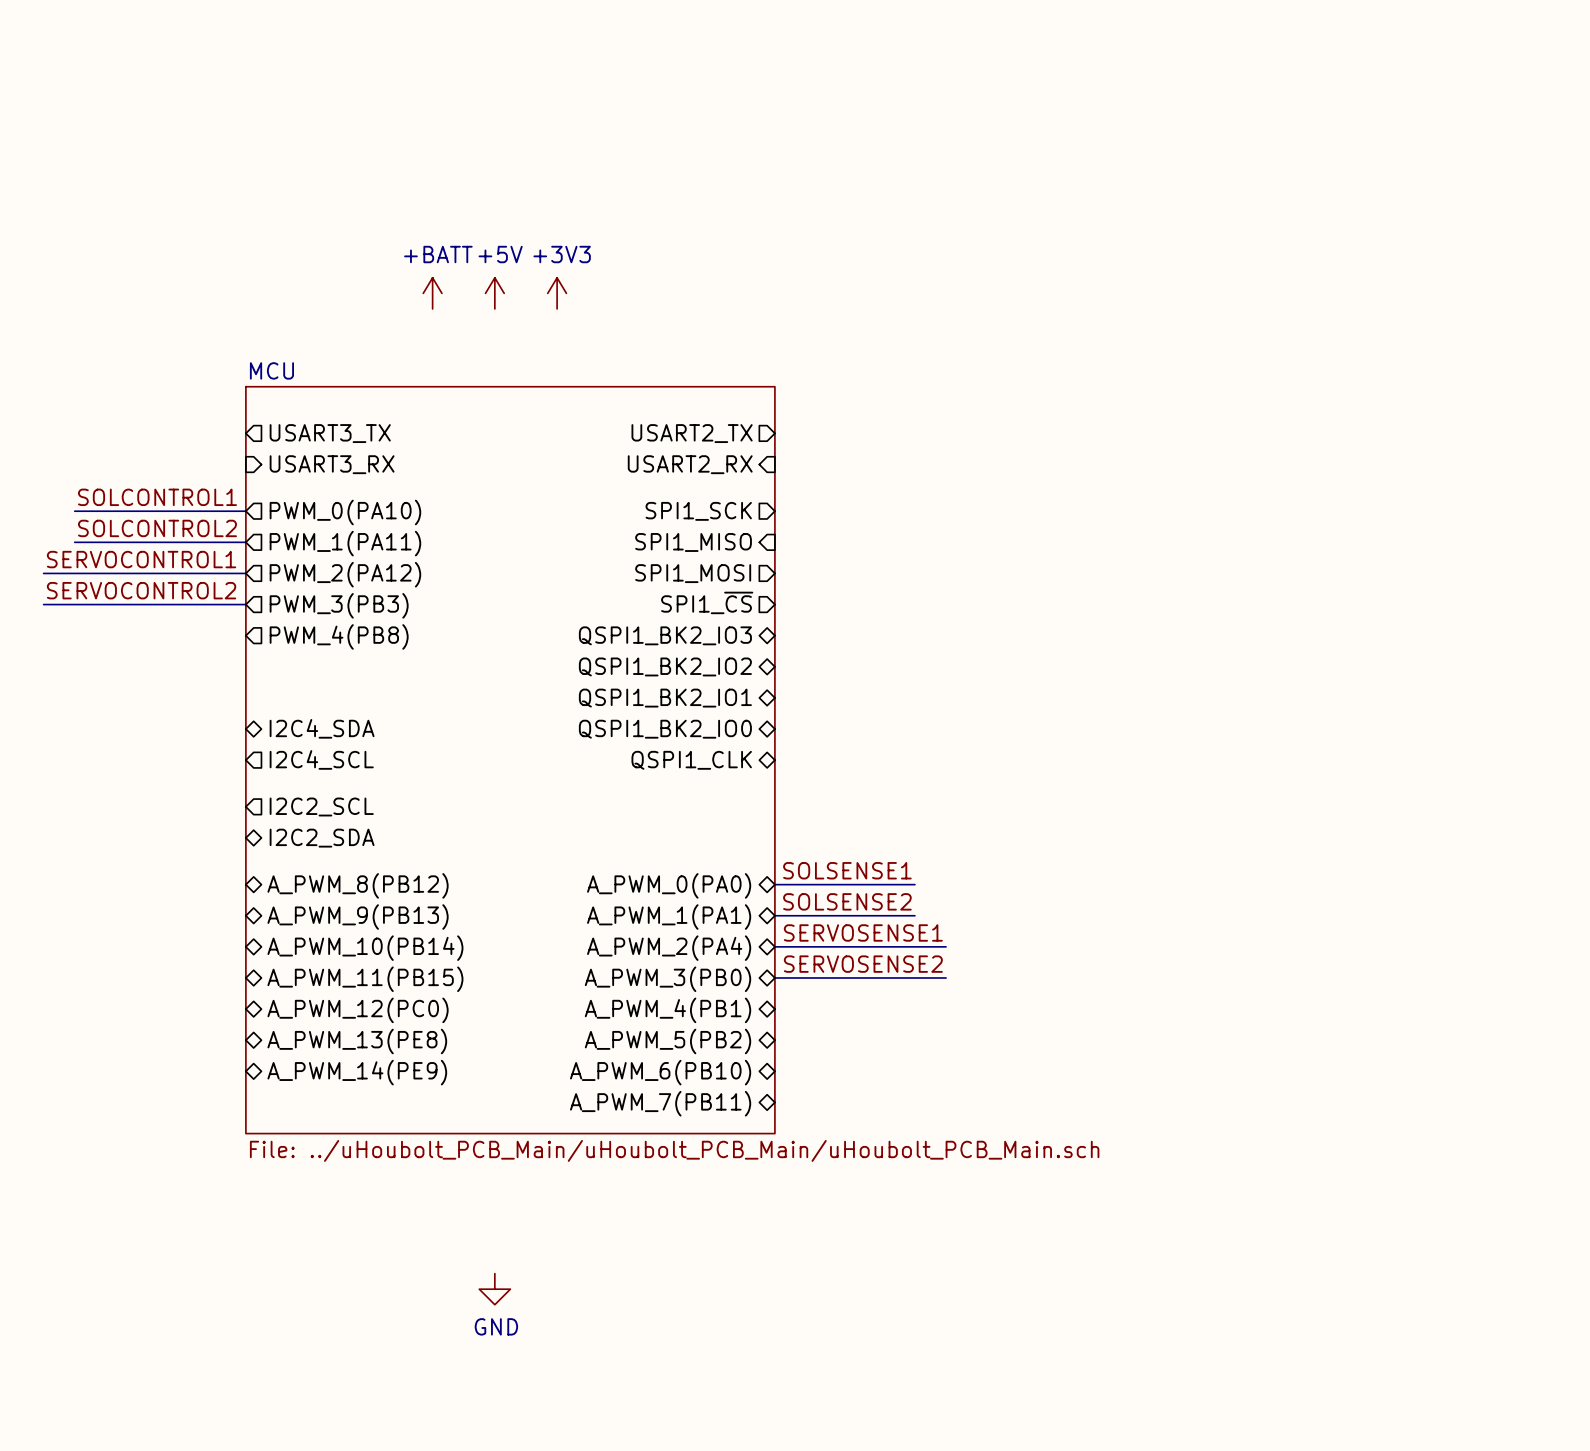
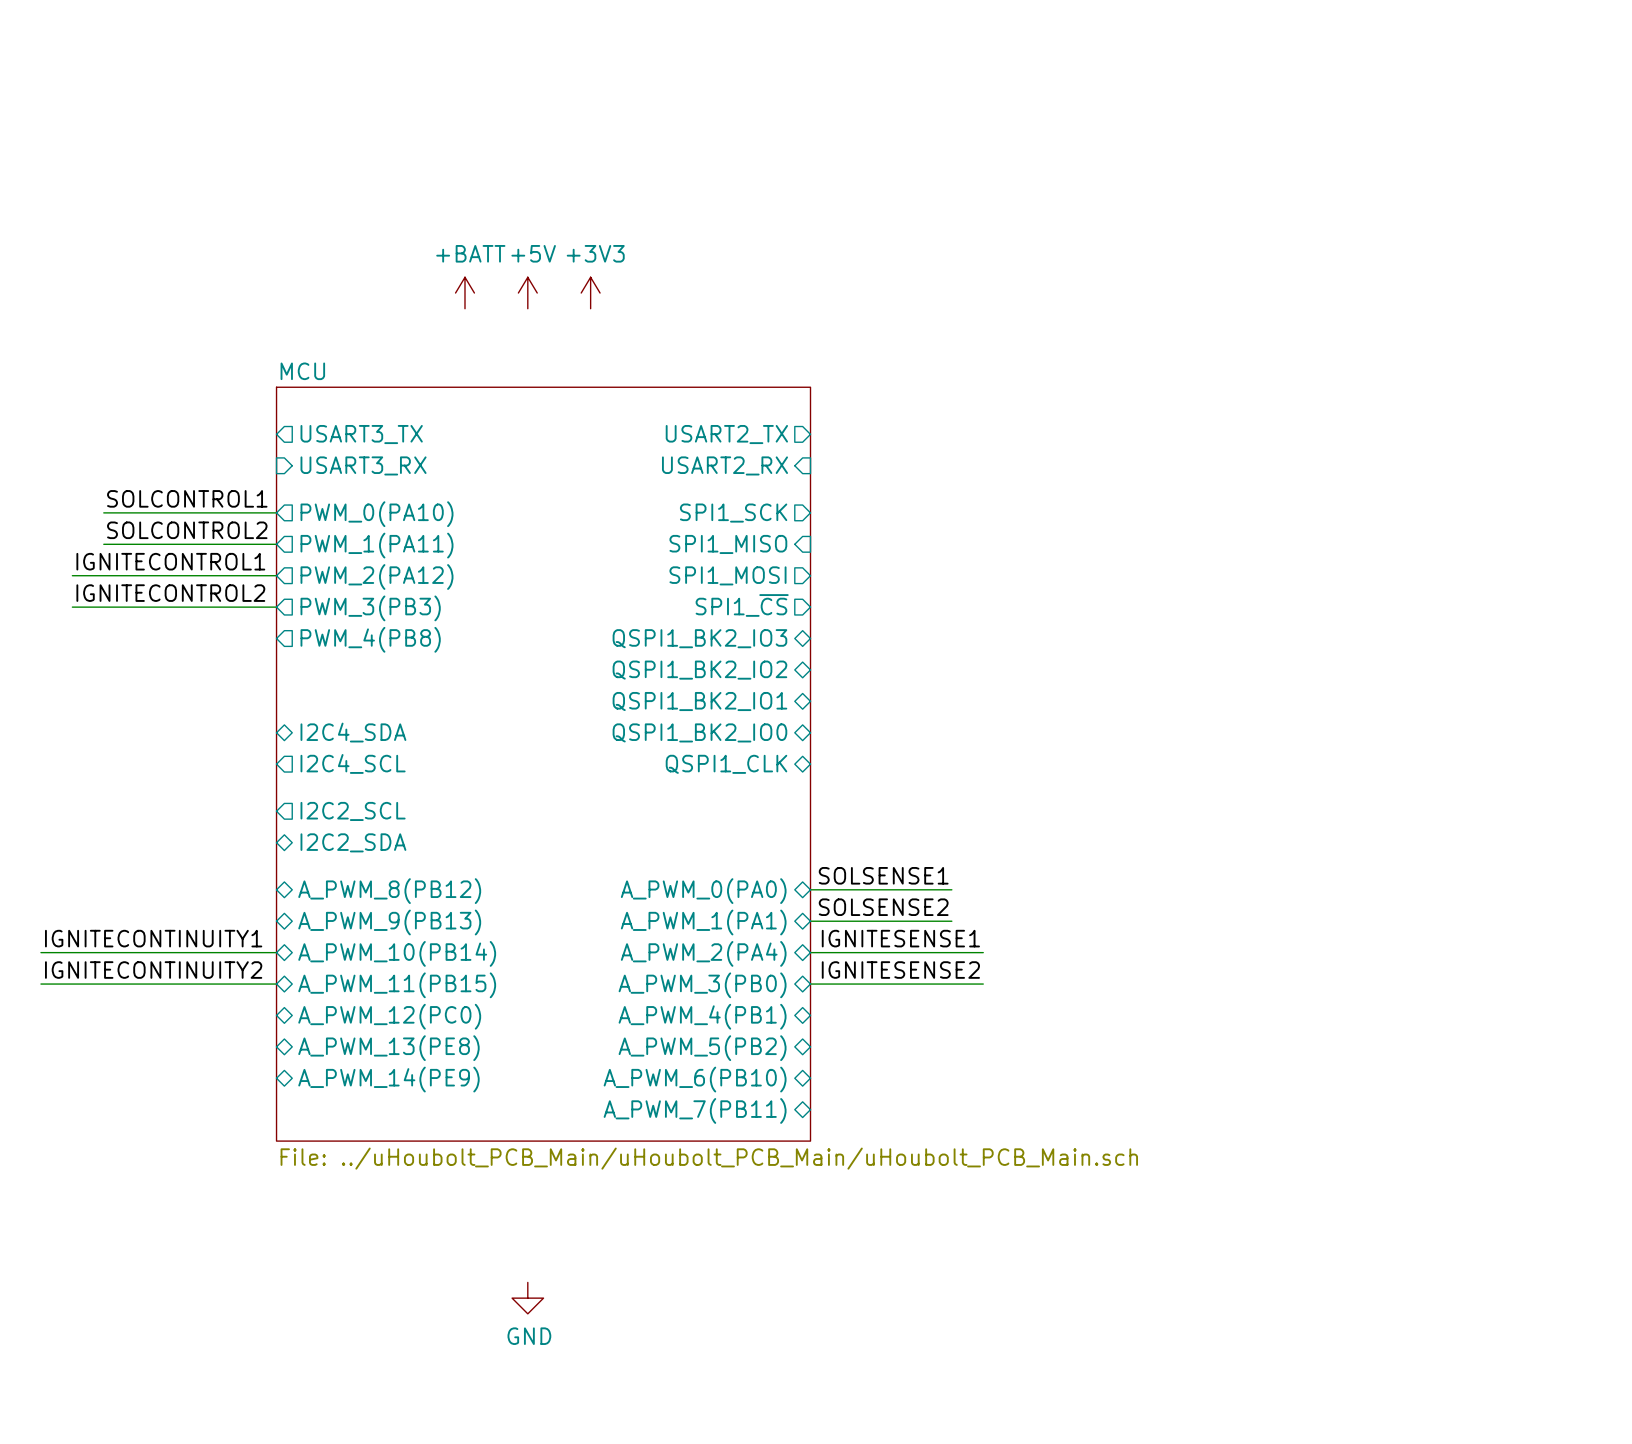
label: SERVOCONTROL1 (141, 559) -> IGNITECONTROL1 (170, 561)
label: SERVOCONTROL2 (141, 590) -> IGNITECONTROL2 (170, 593)
label: none -> IGNITECONTINUITY1 (153, 938)
label: SERVOSENSE1 (863, 932) -> IGNITESENSE1 (900, 938)
wire: none -> (40, 952) (276, 952)
label: none -> IGNITECONTINUITY2 (153, 970)
label: SERVOSENSE2 (863, 964) -> IGNITESENSE2 (900, 970)
wire: none -> (40, 984) (276, 984)

